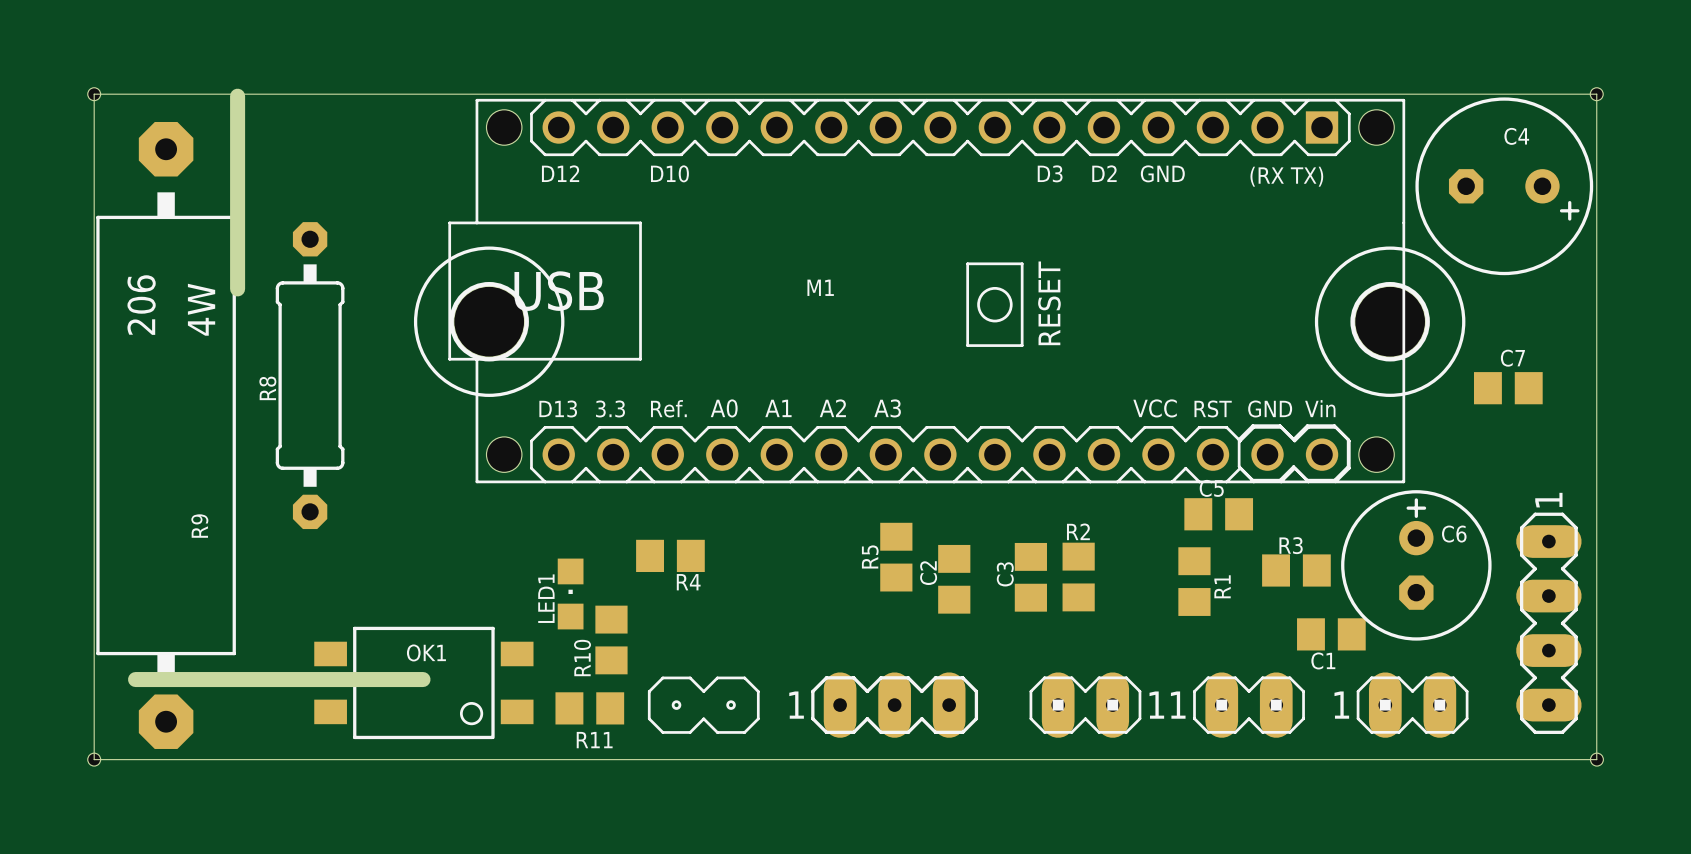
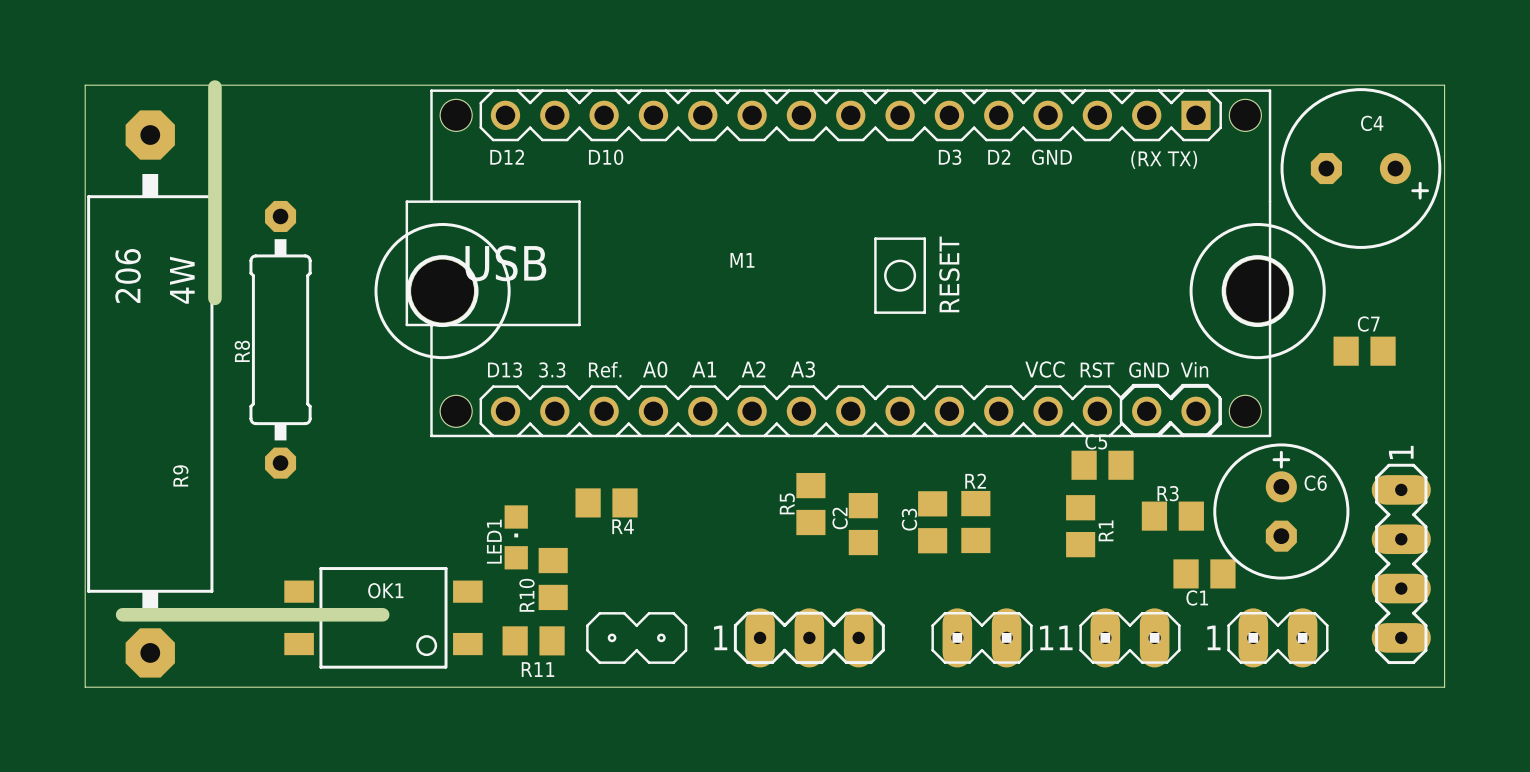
hole: (94, 94) -> none
hole: (1596, 94) -> none
board edge: none -> (214, 261) (214, 298)
hole: (94, 759) -> none
hole: (1596, 759) -> none

